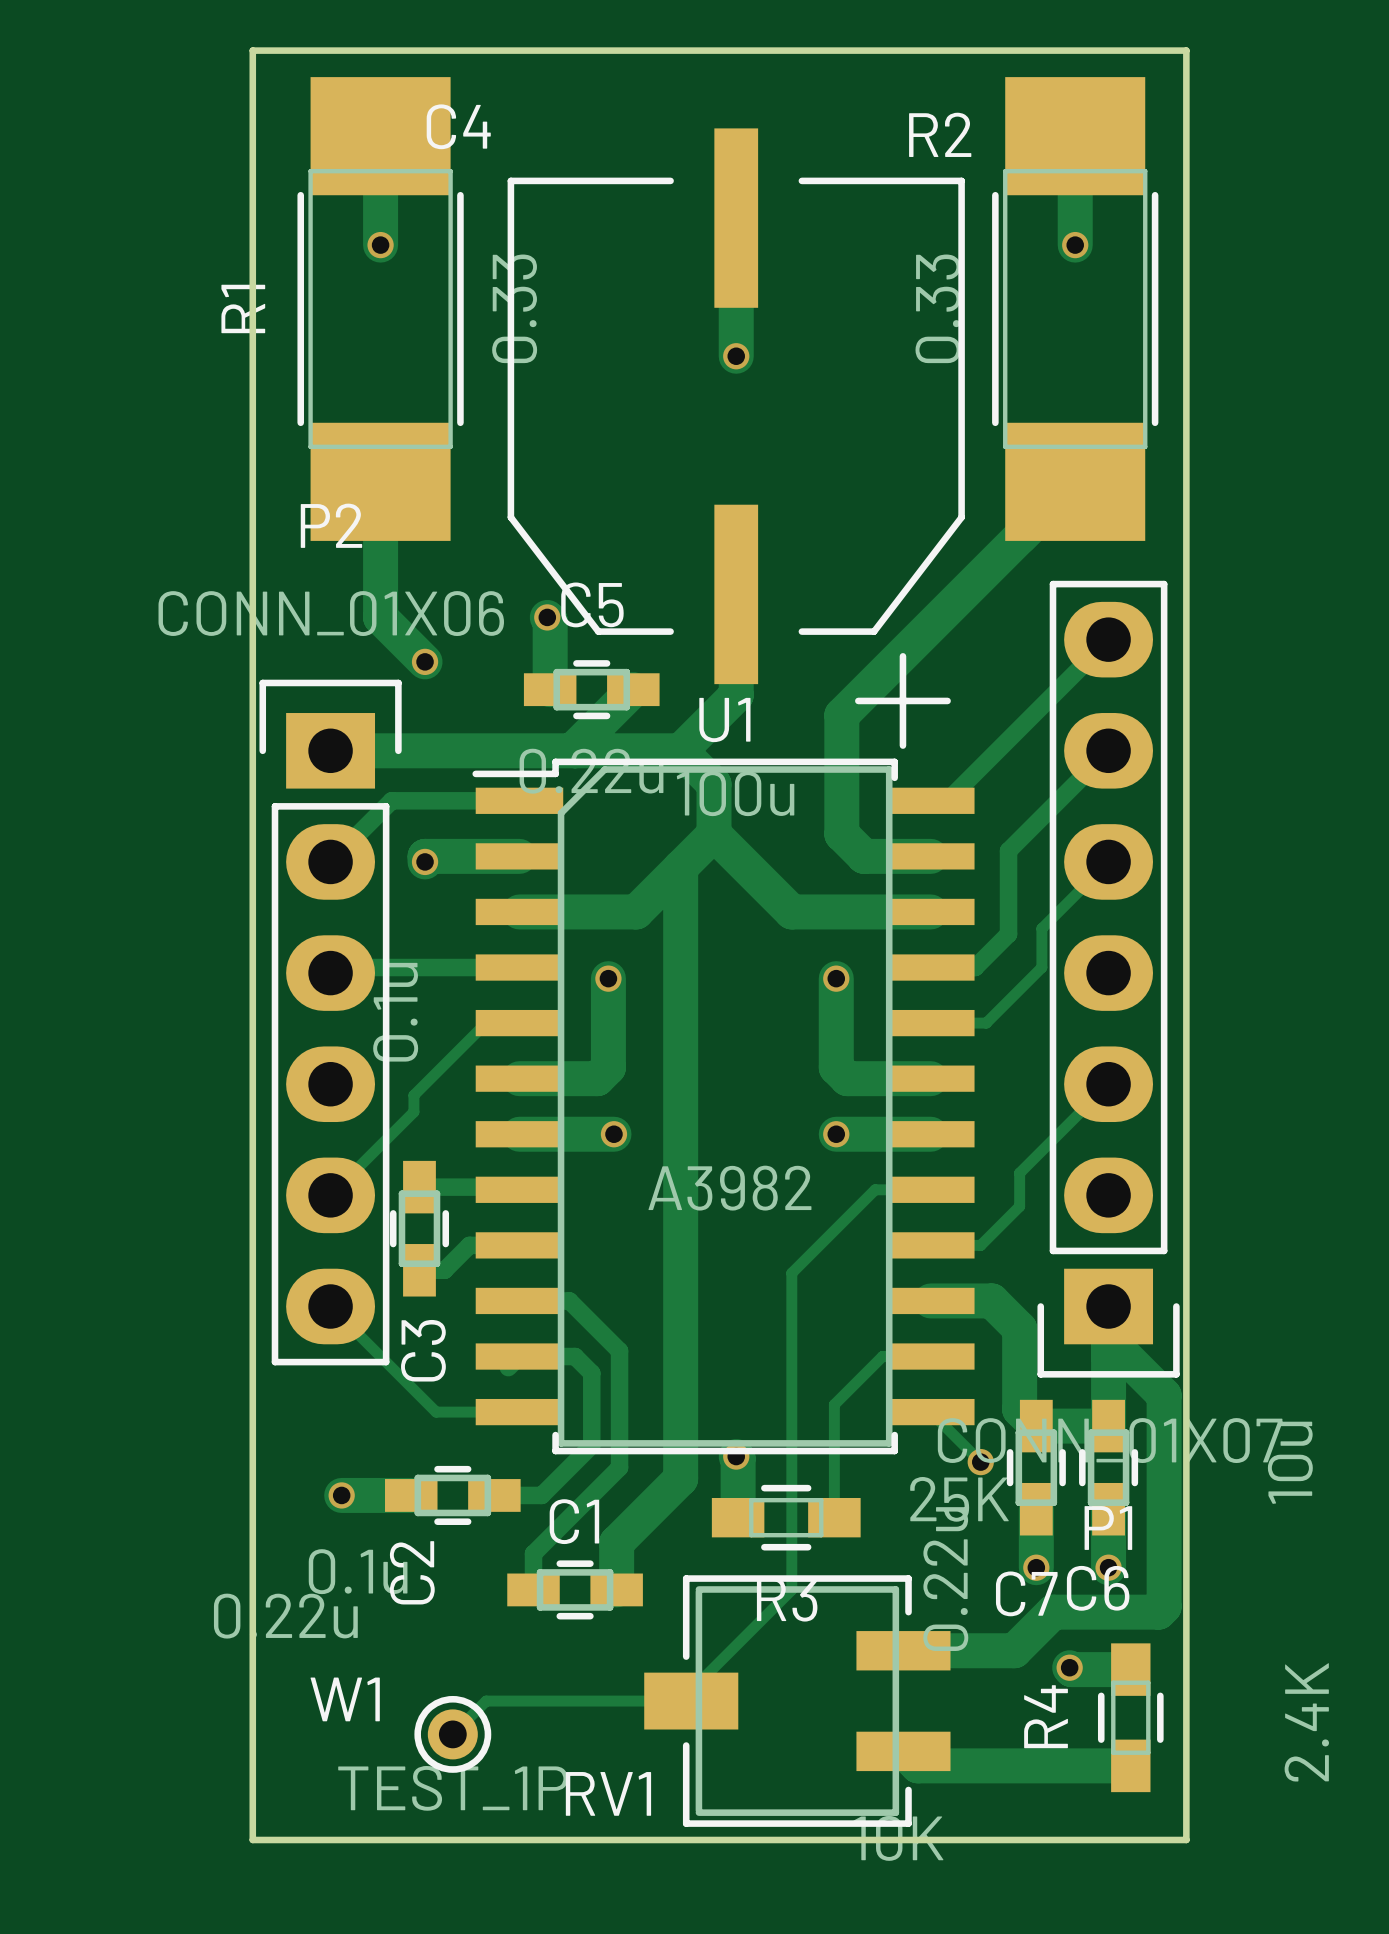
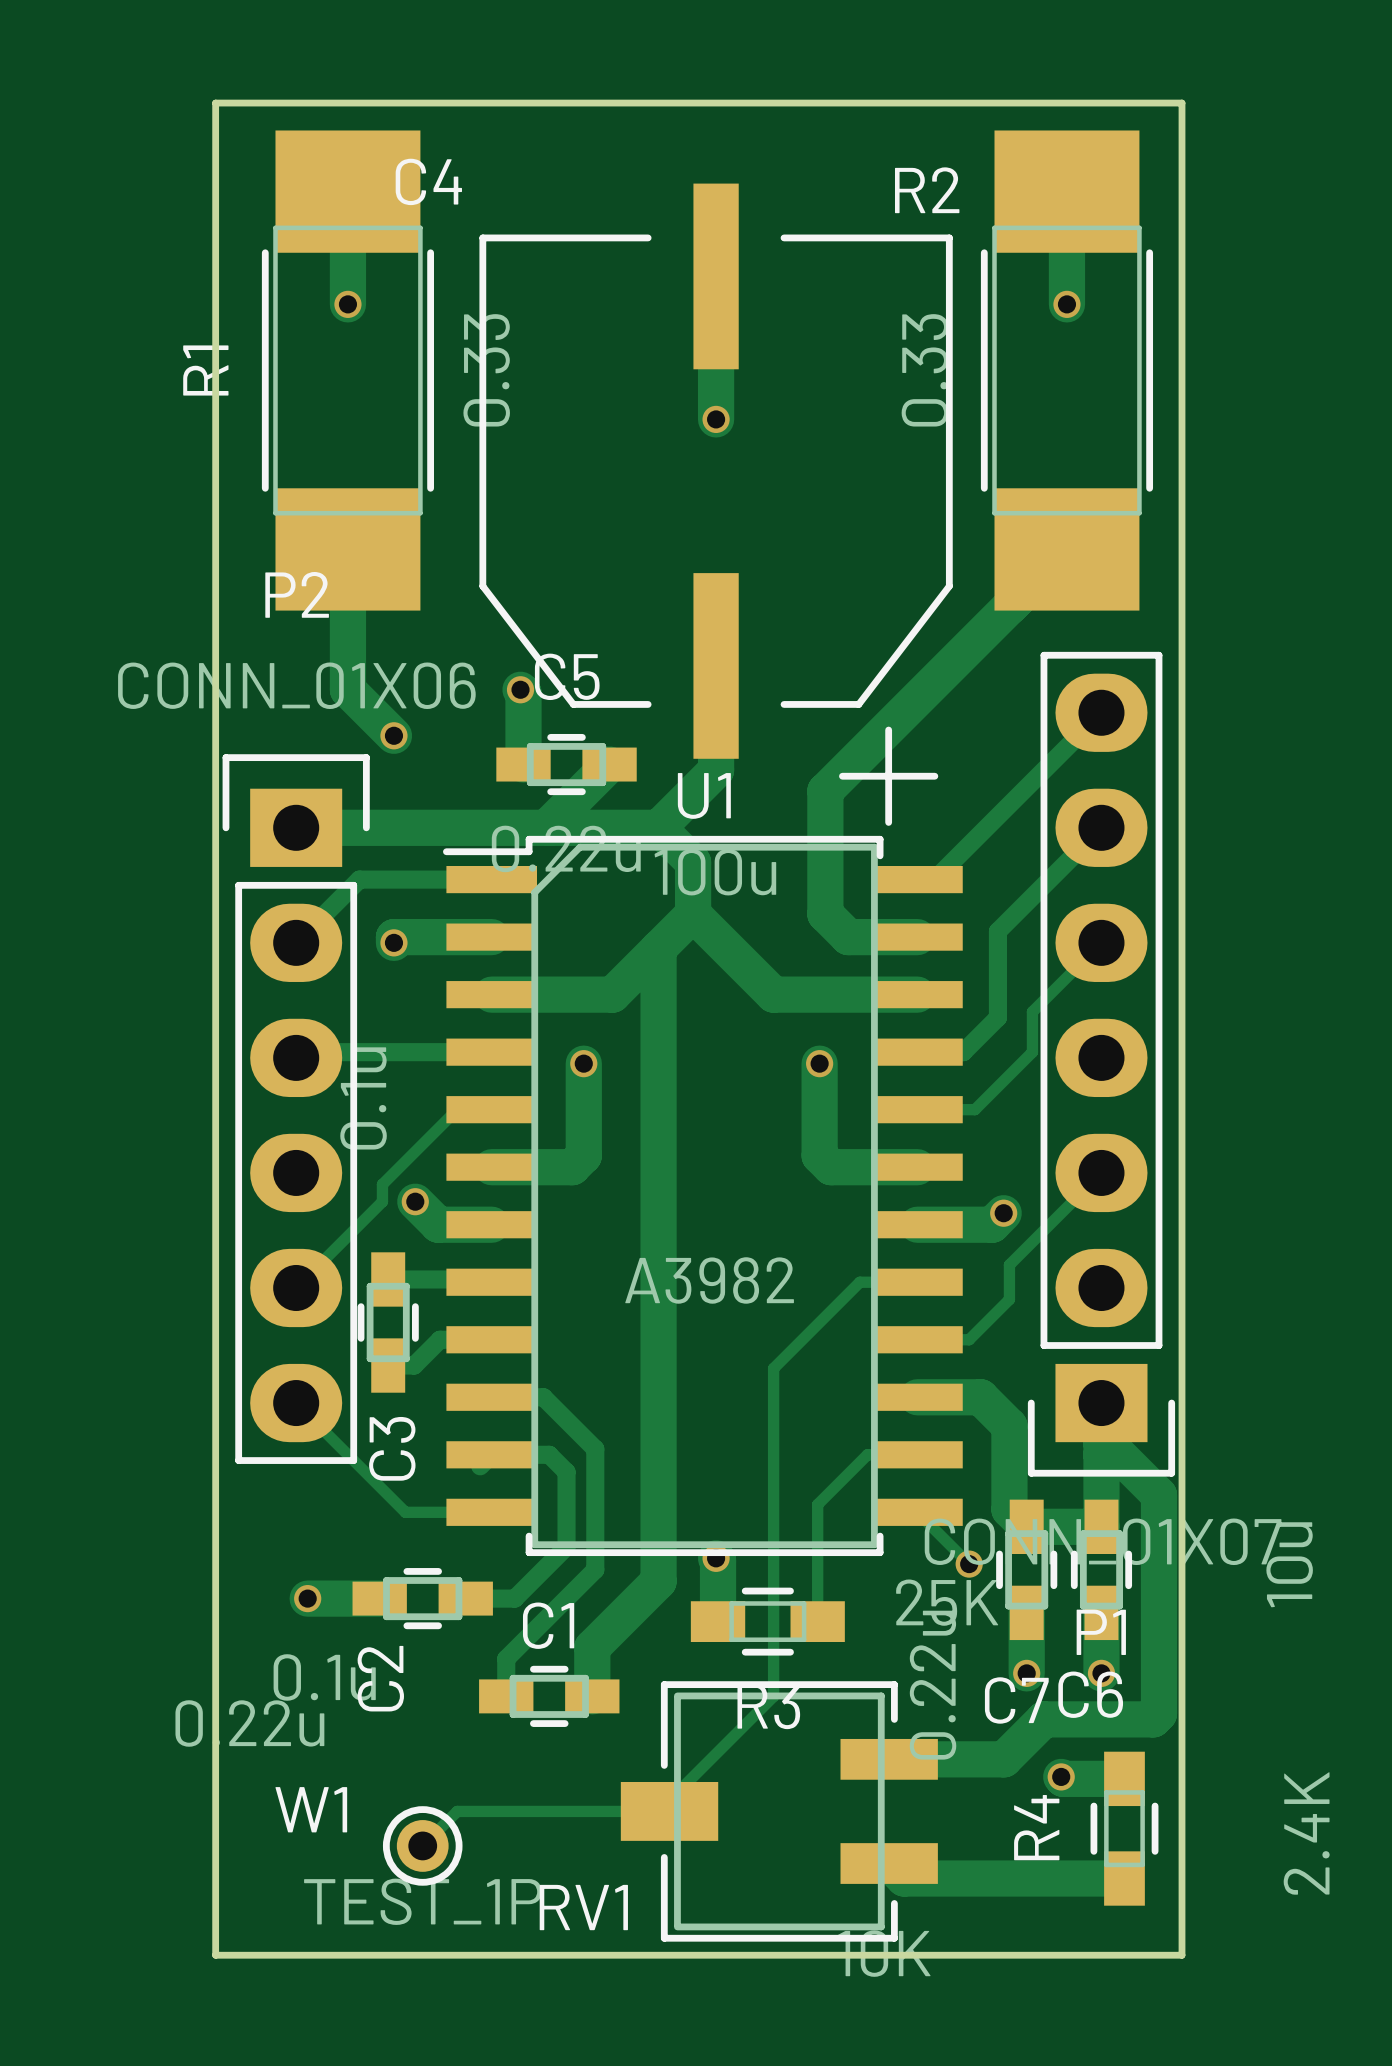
track: (519, 1134) (613, 1134) -> (491, 1224) (438, 1224) (415, 1201)
via position: (613, 1134) -> (415, 1201)
track: (836, 1134) (930, 1134) -> (1003, 1213) (992, 1224) (917, 1224)
via position: (836, 1134) -> (1003, 1213)

